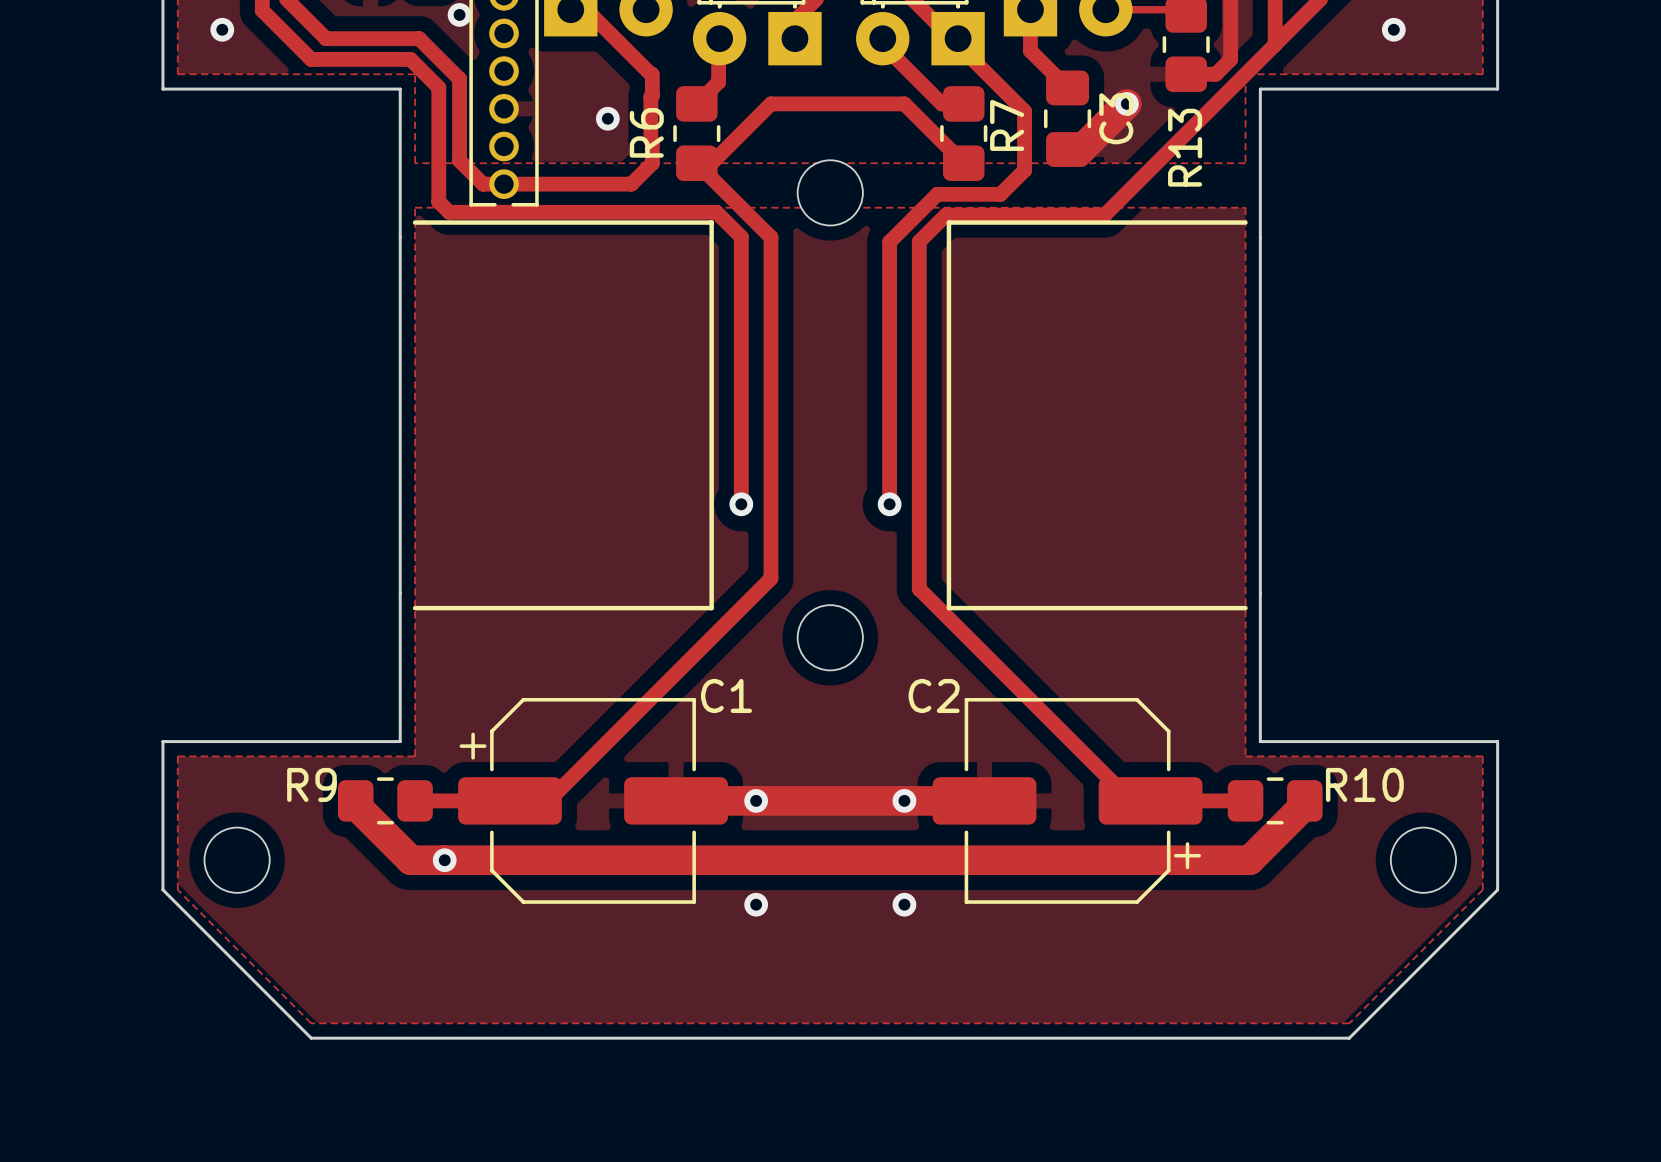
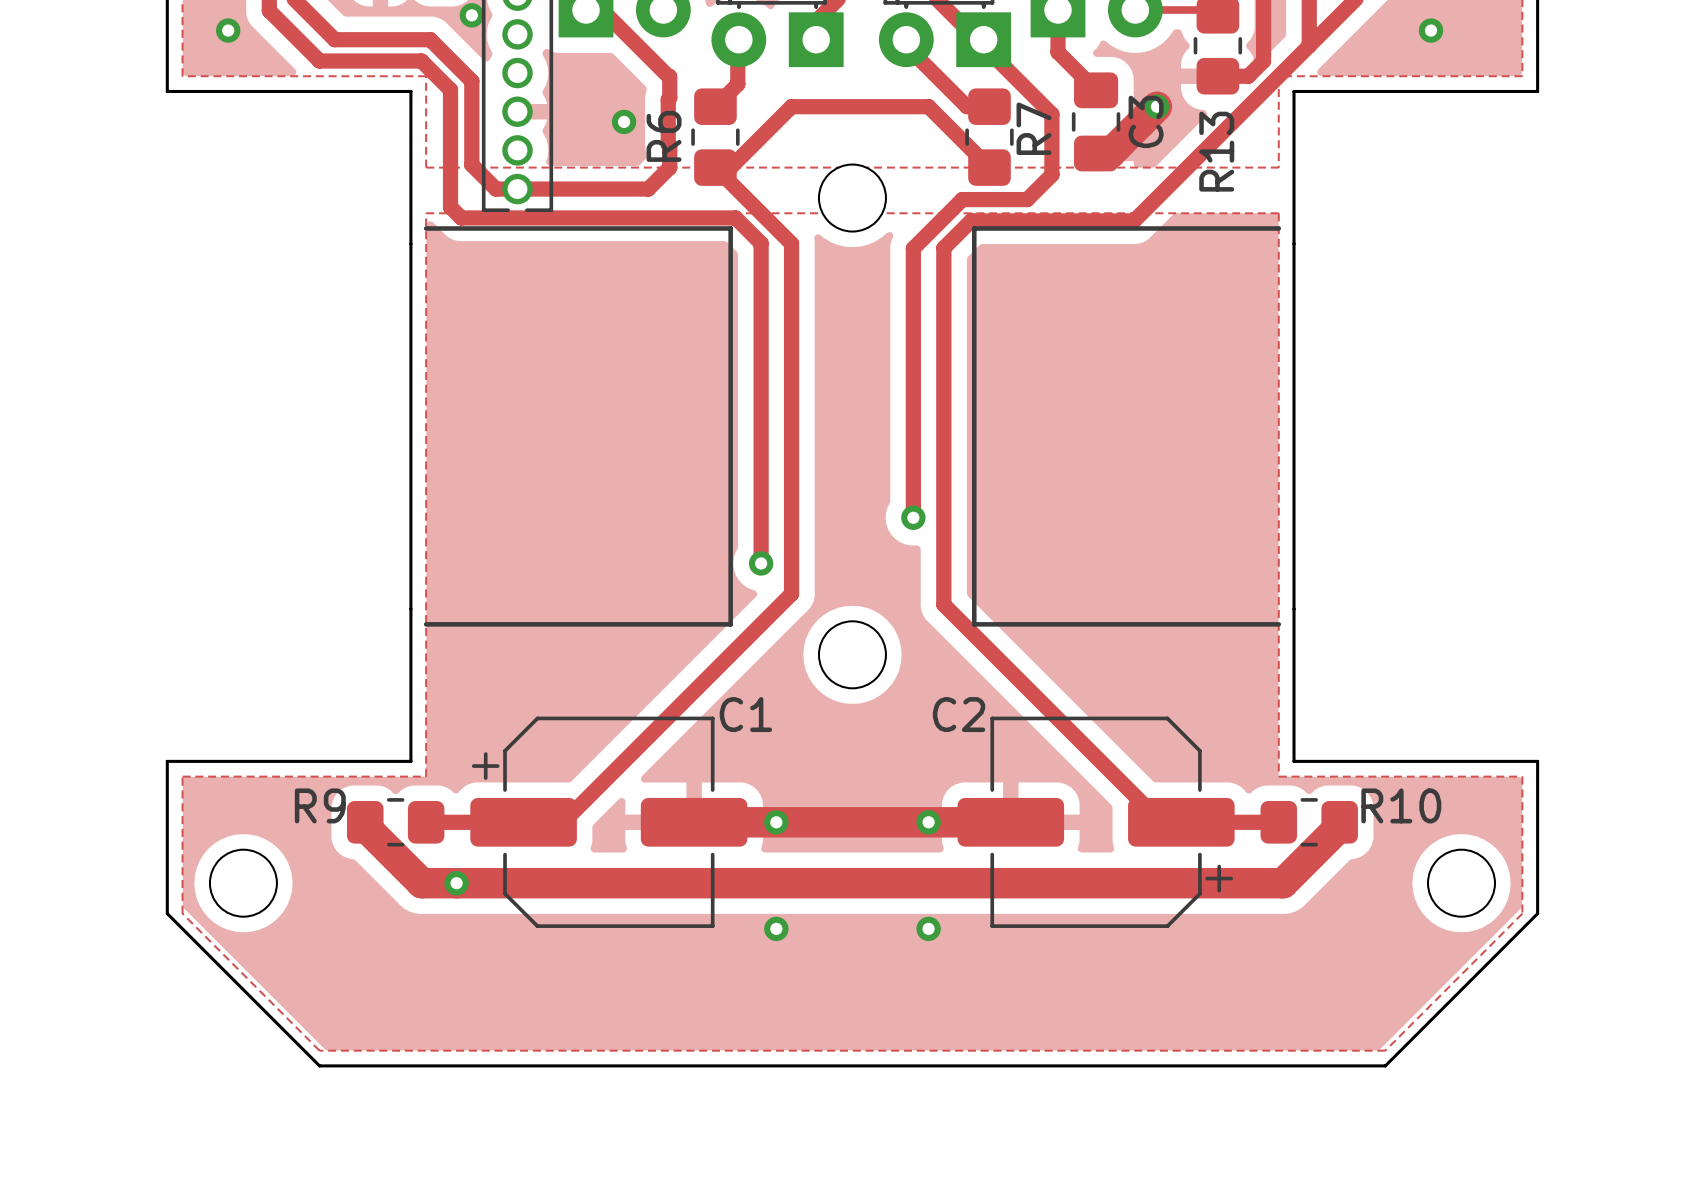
track: none -> (761, 517) (761, 563)
via position: (741, 504) -> (761, 563)

